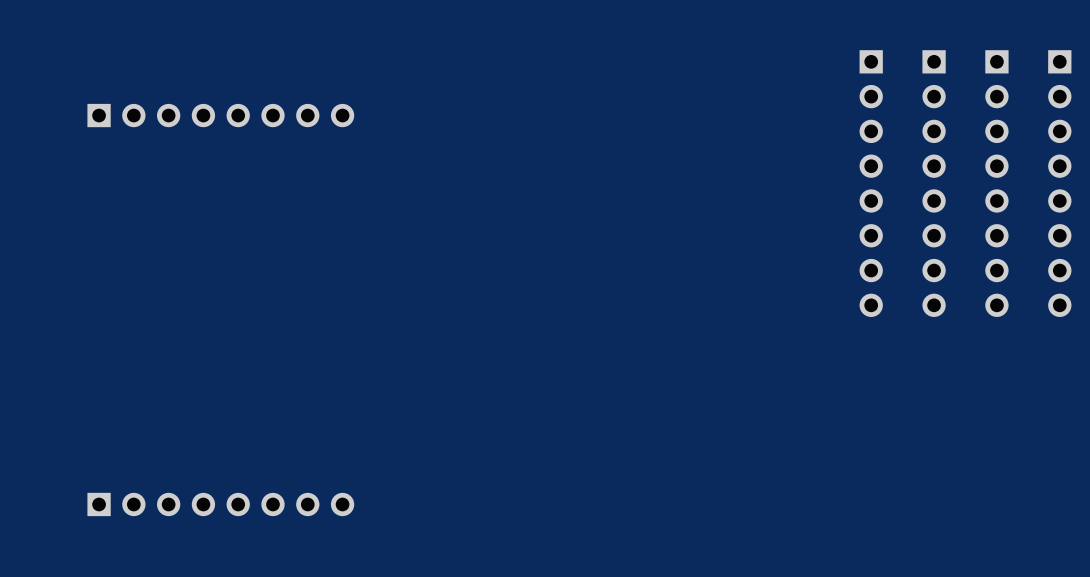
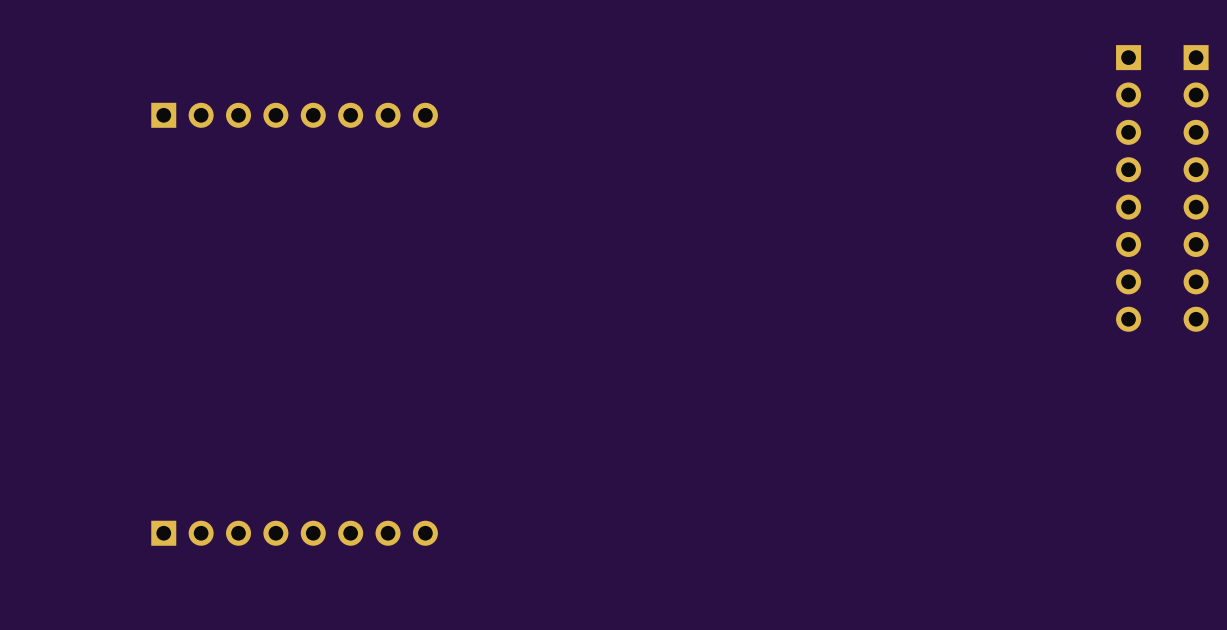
part: (871, 183) -> none
part: (934, 183) -> none

